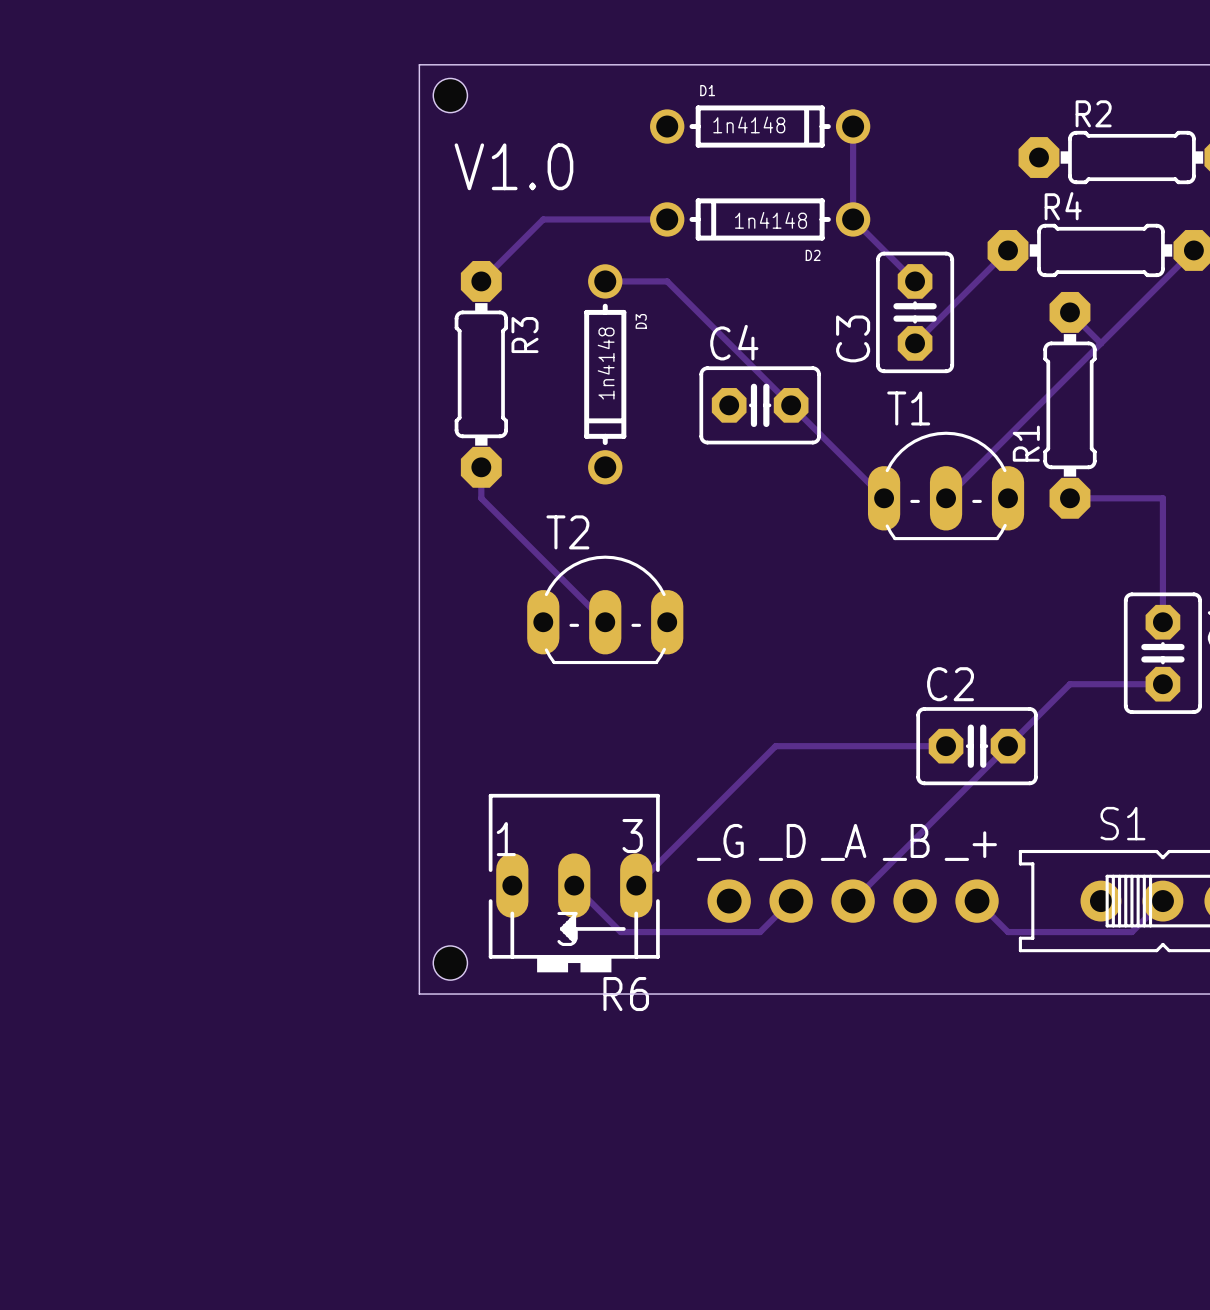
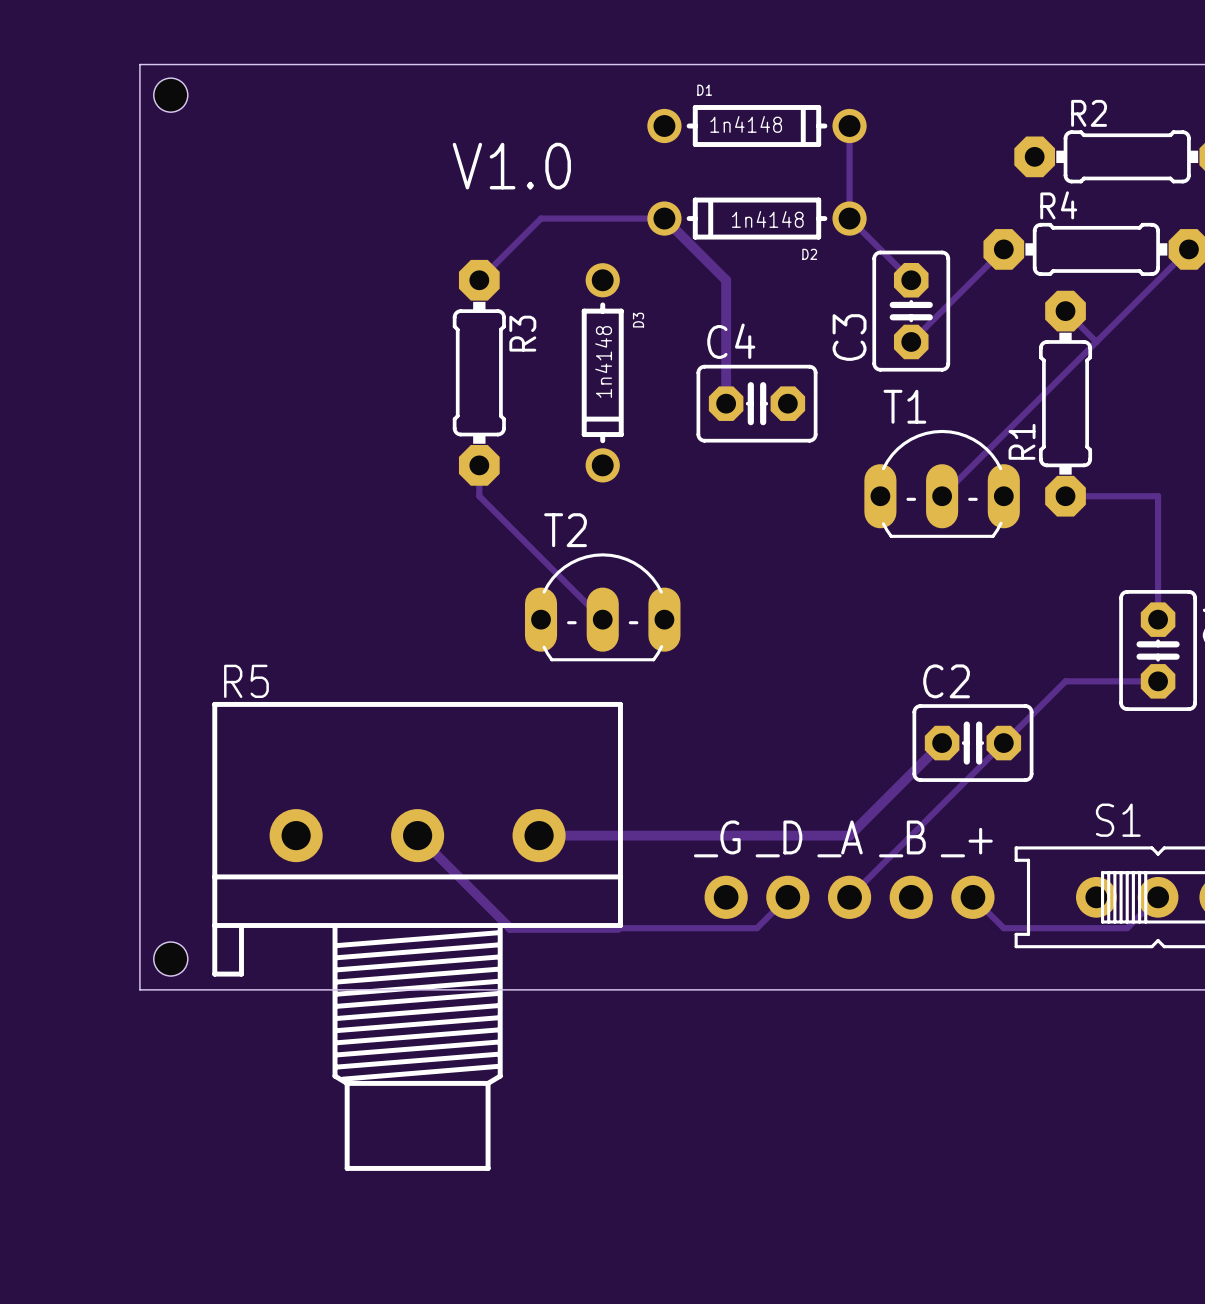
board edge: (419, 64) (419, 994) -> (417, 64) (139, 64) (139, 989) (417, 989)
hole position: (450, 95) -> (170, 95)
track: none -> (664, 218) (726, 280) (726, 403)
track: (605, 281) (667, 281) (884, 498) -> none
track: (946, 746) (775, 746) (636, 885) -> (942, 743) (849, 835) (539, 835)
R6: (574, 883) -> none
track: (574, 885) (620, 932) -> (417, 835) (510, 928) (618, 928)
R5: none -> (417, 936)
hole position: (450, 963) -> (170, 959)

